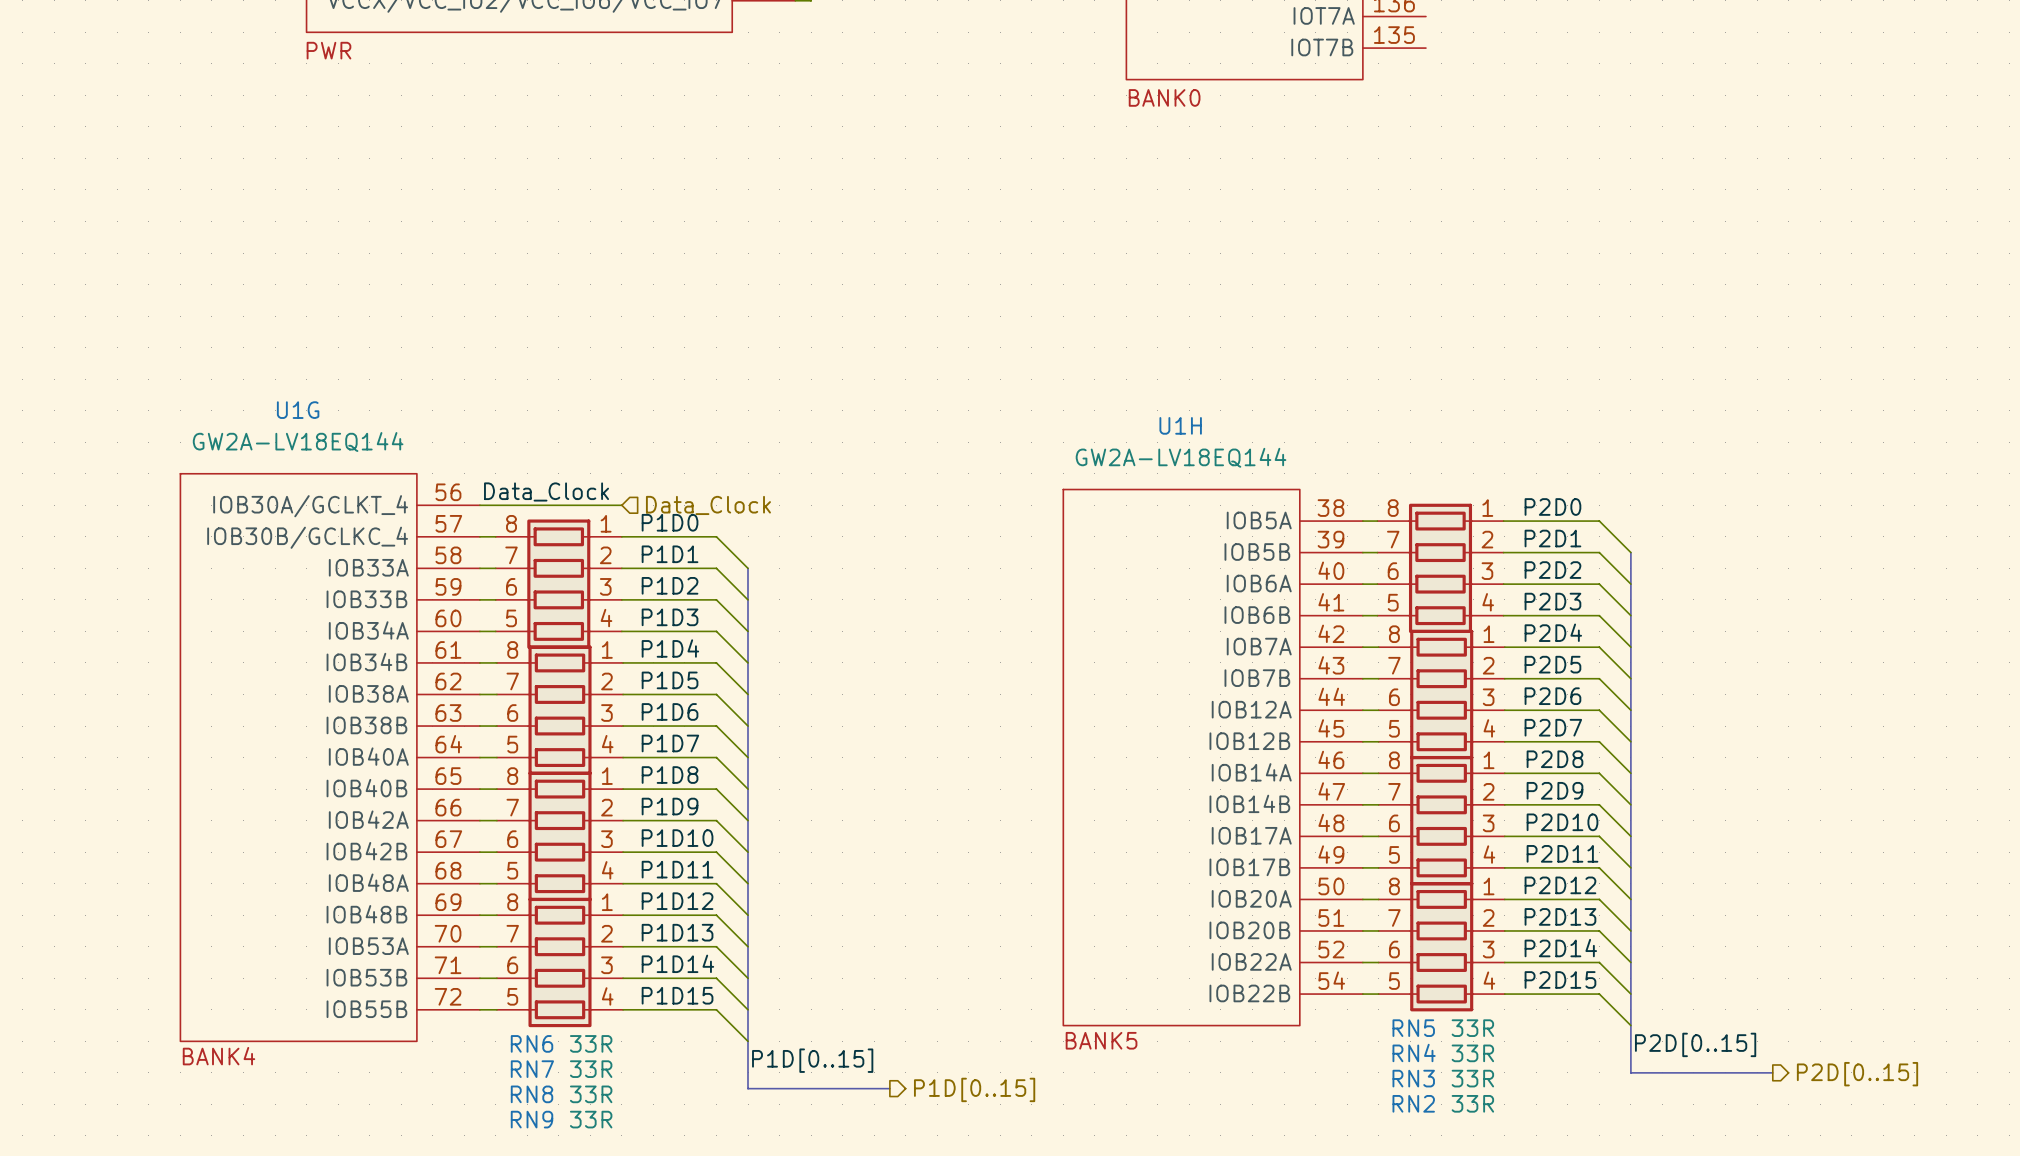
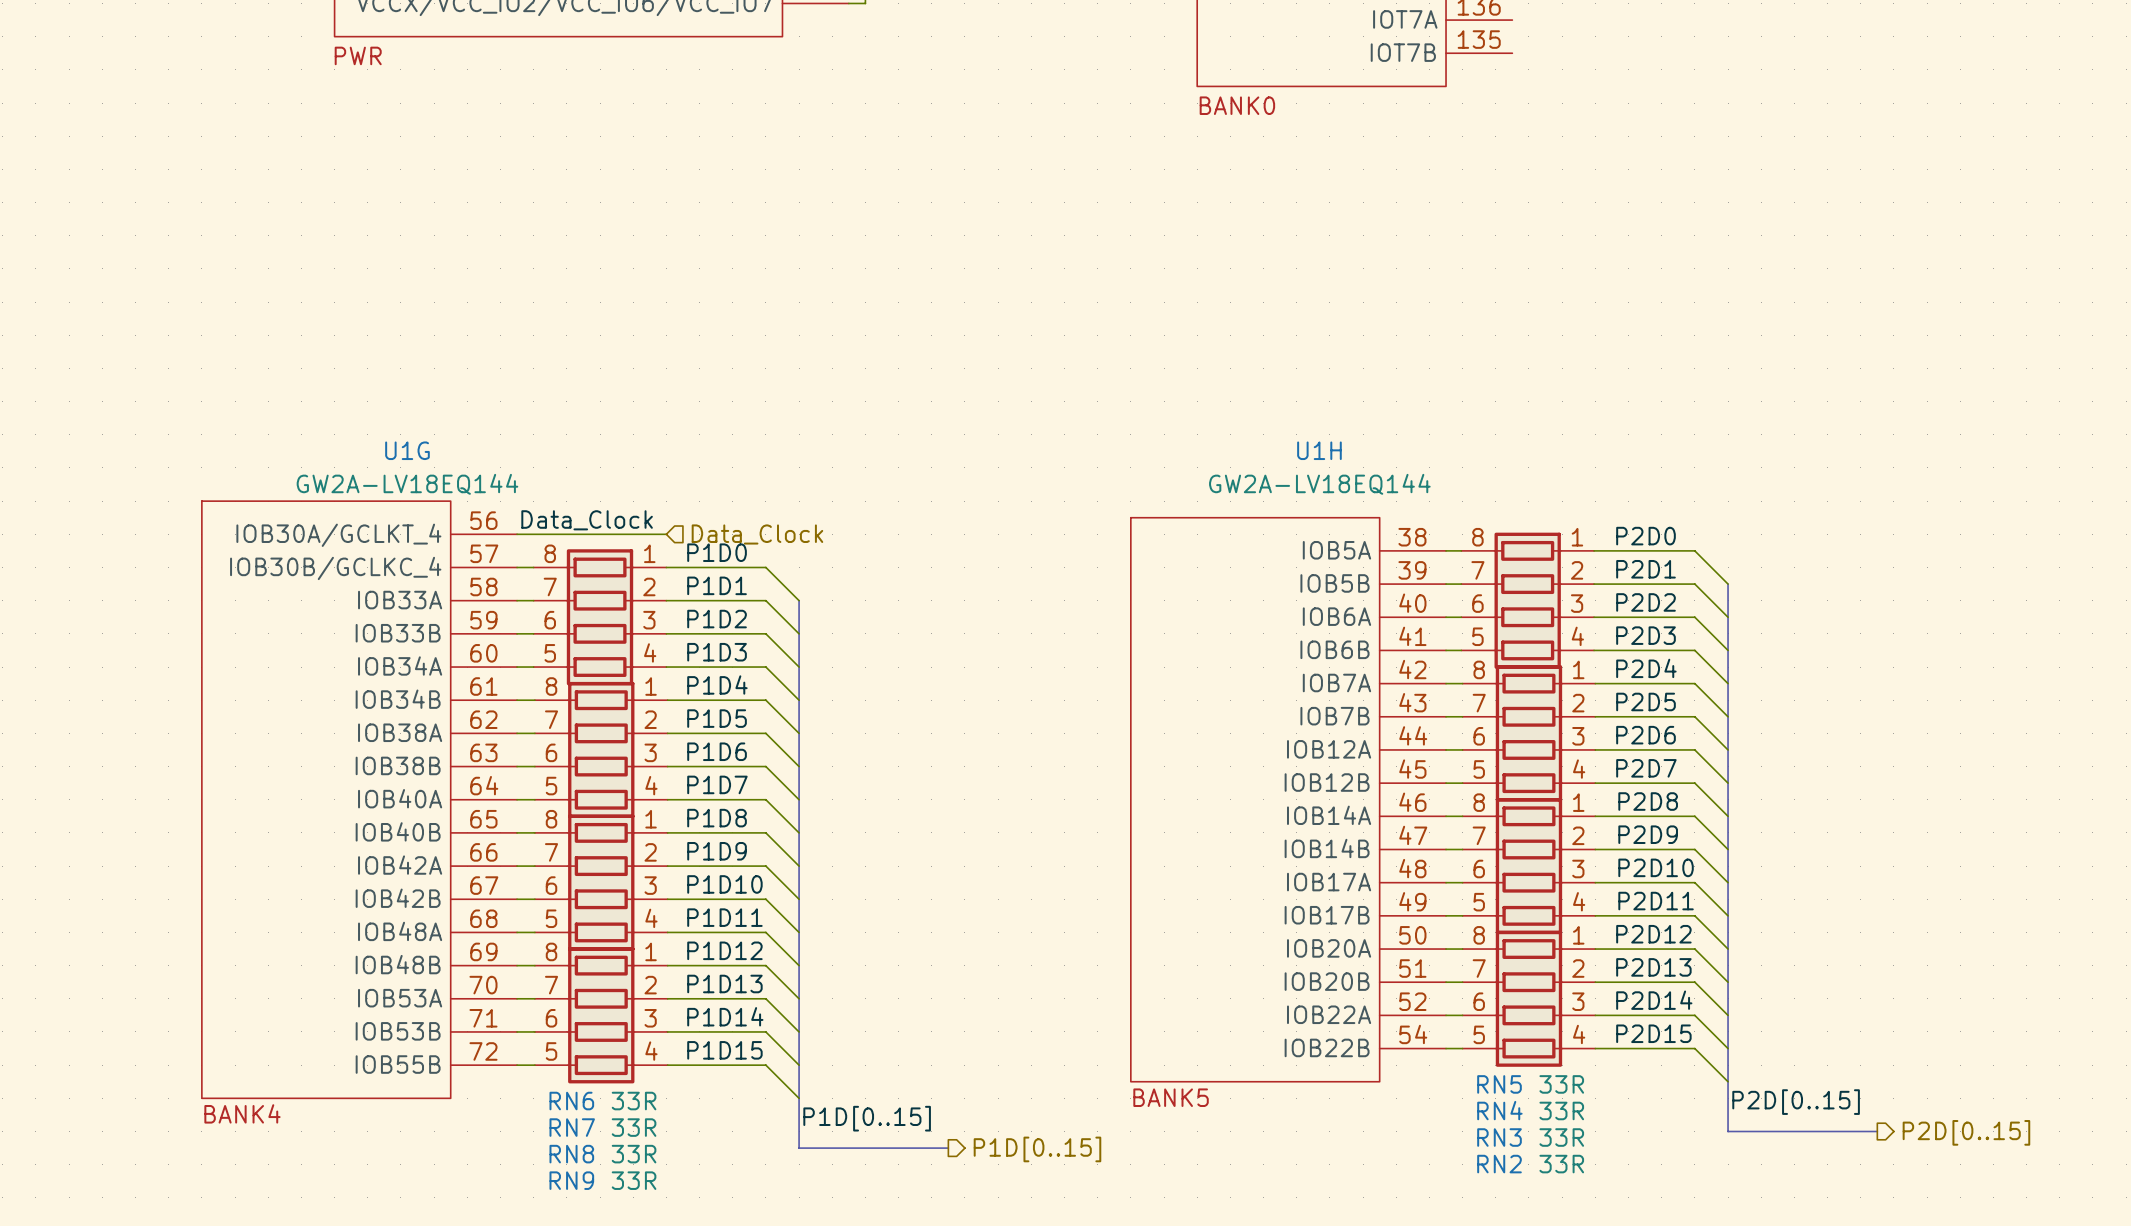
U1G name position: U1G (298, 410) -> U1G (407, 450)
U1H name position: U1H (1180, 425) -> U1H (1319, 450)
U1G value position: GW2A-LV18EQ144 (298, 442) -> GW2A-LV18EQ144 (407, 484)
U1H value position: GW2A-LV18EQ144 (1181, 457) -> GW2A-LV18EQ144 (1319, 484)

